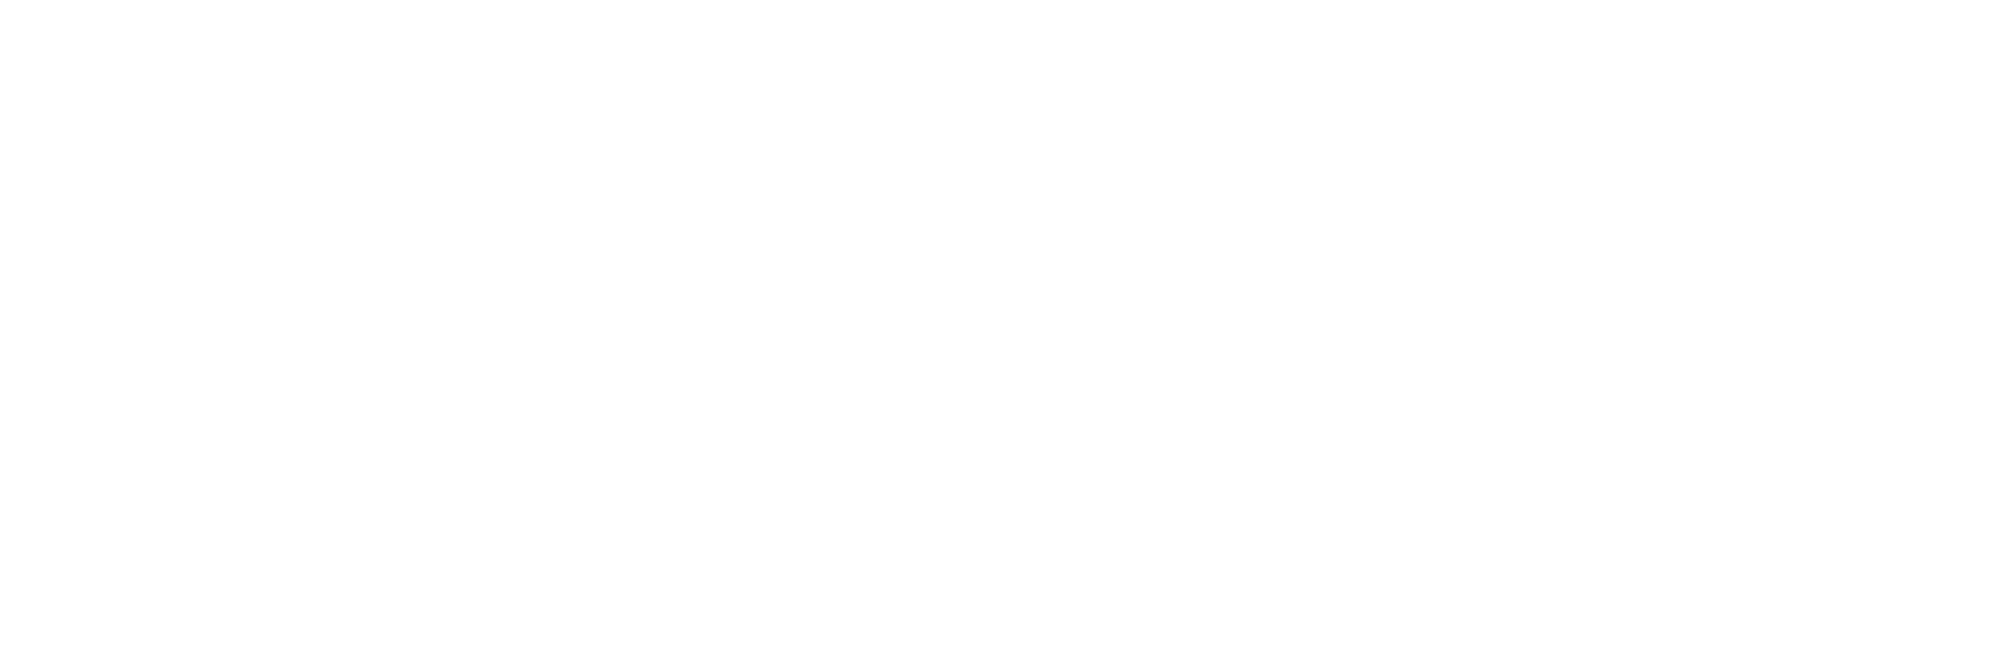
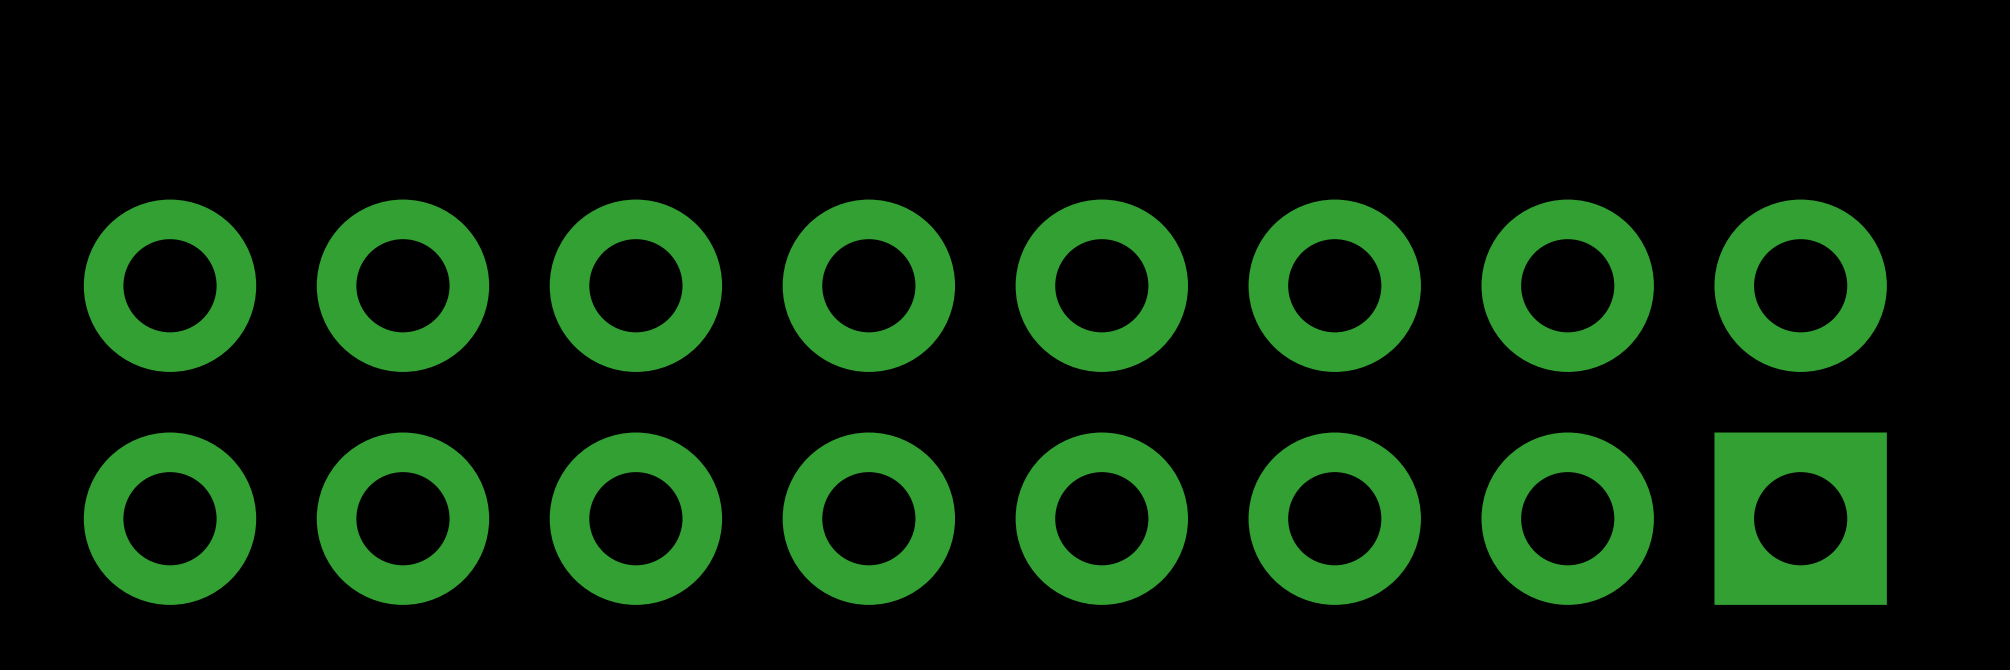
part: none -> (985, 402)

